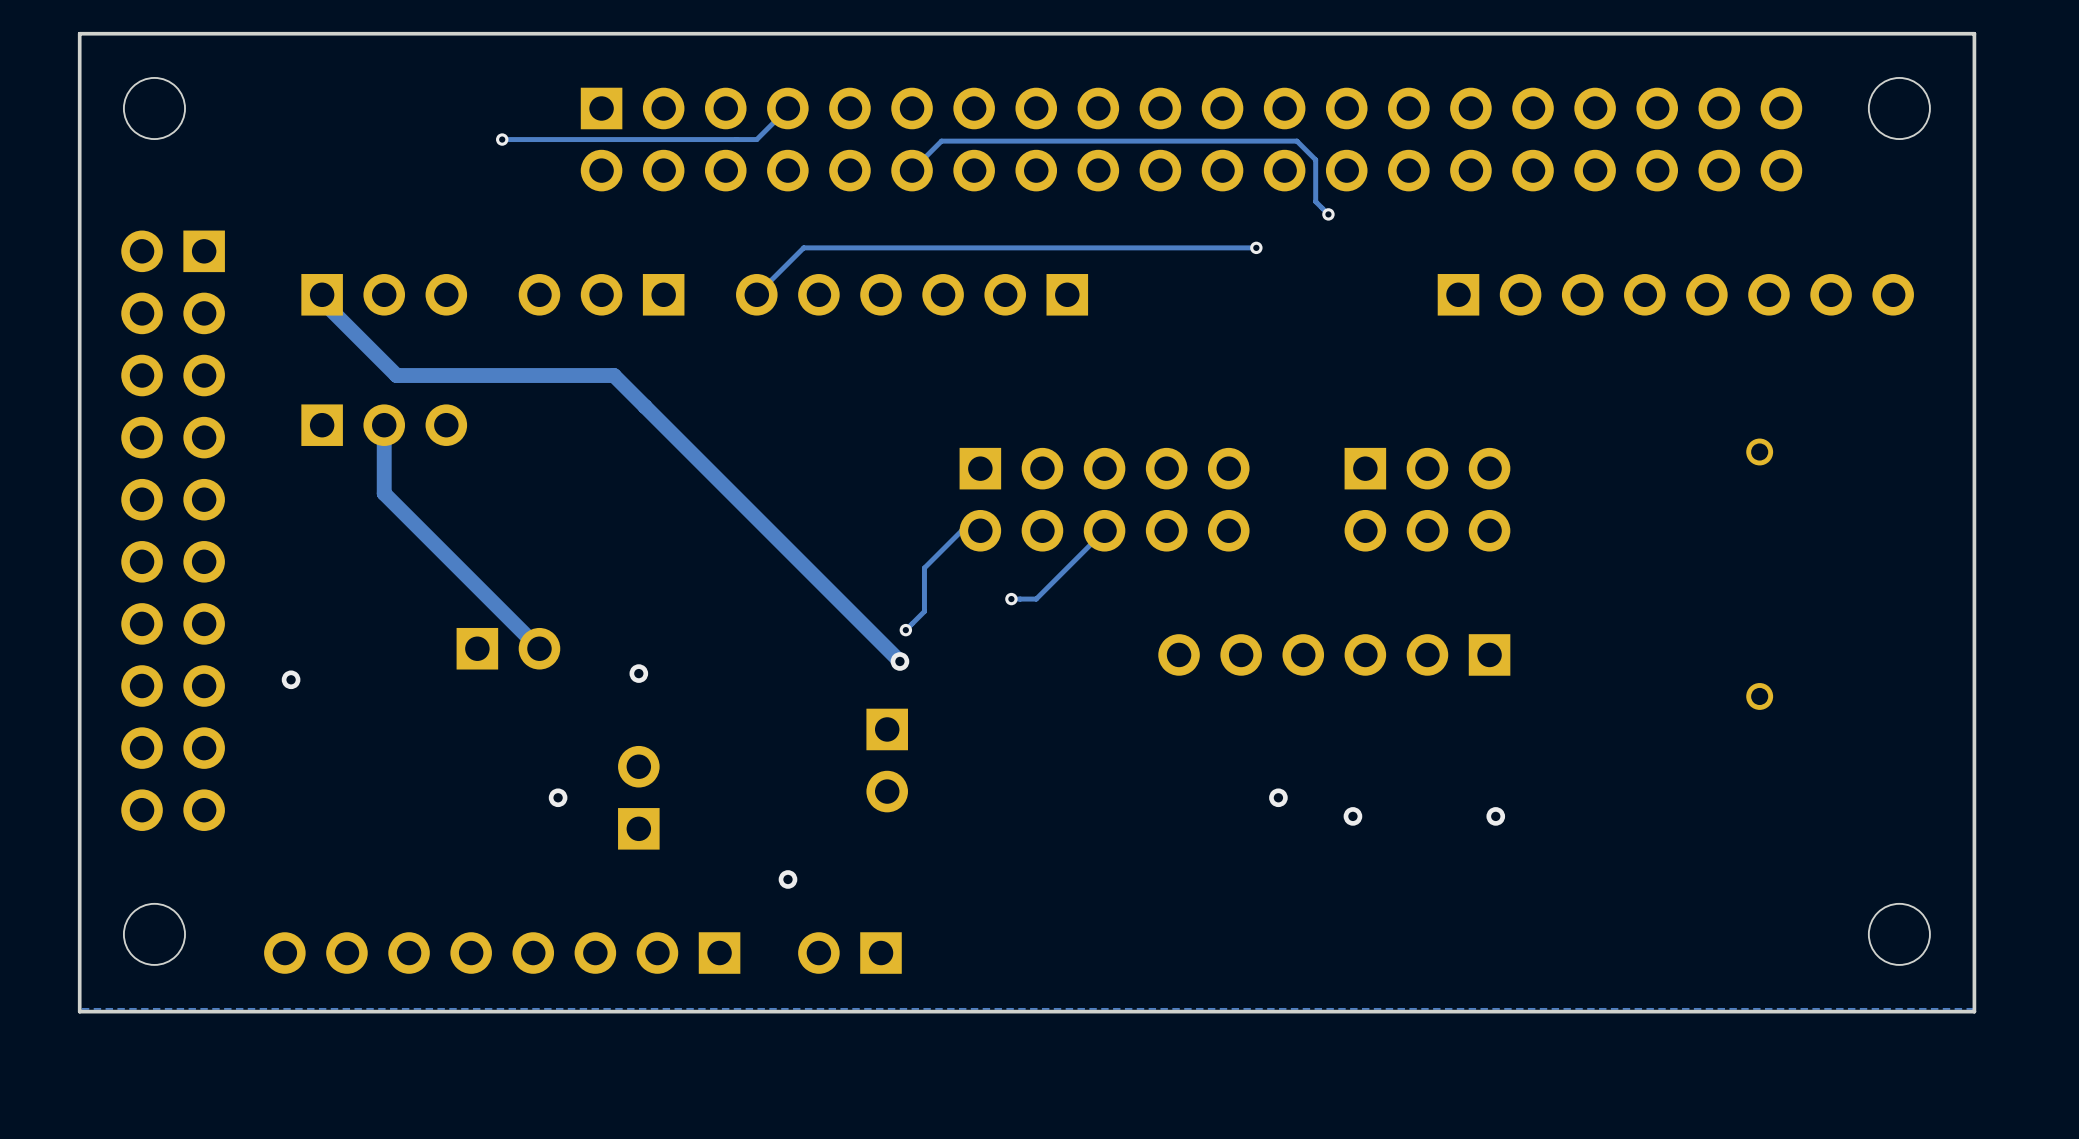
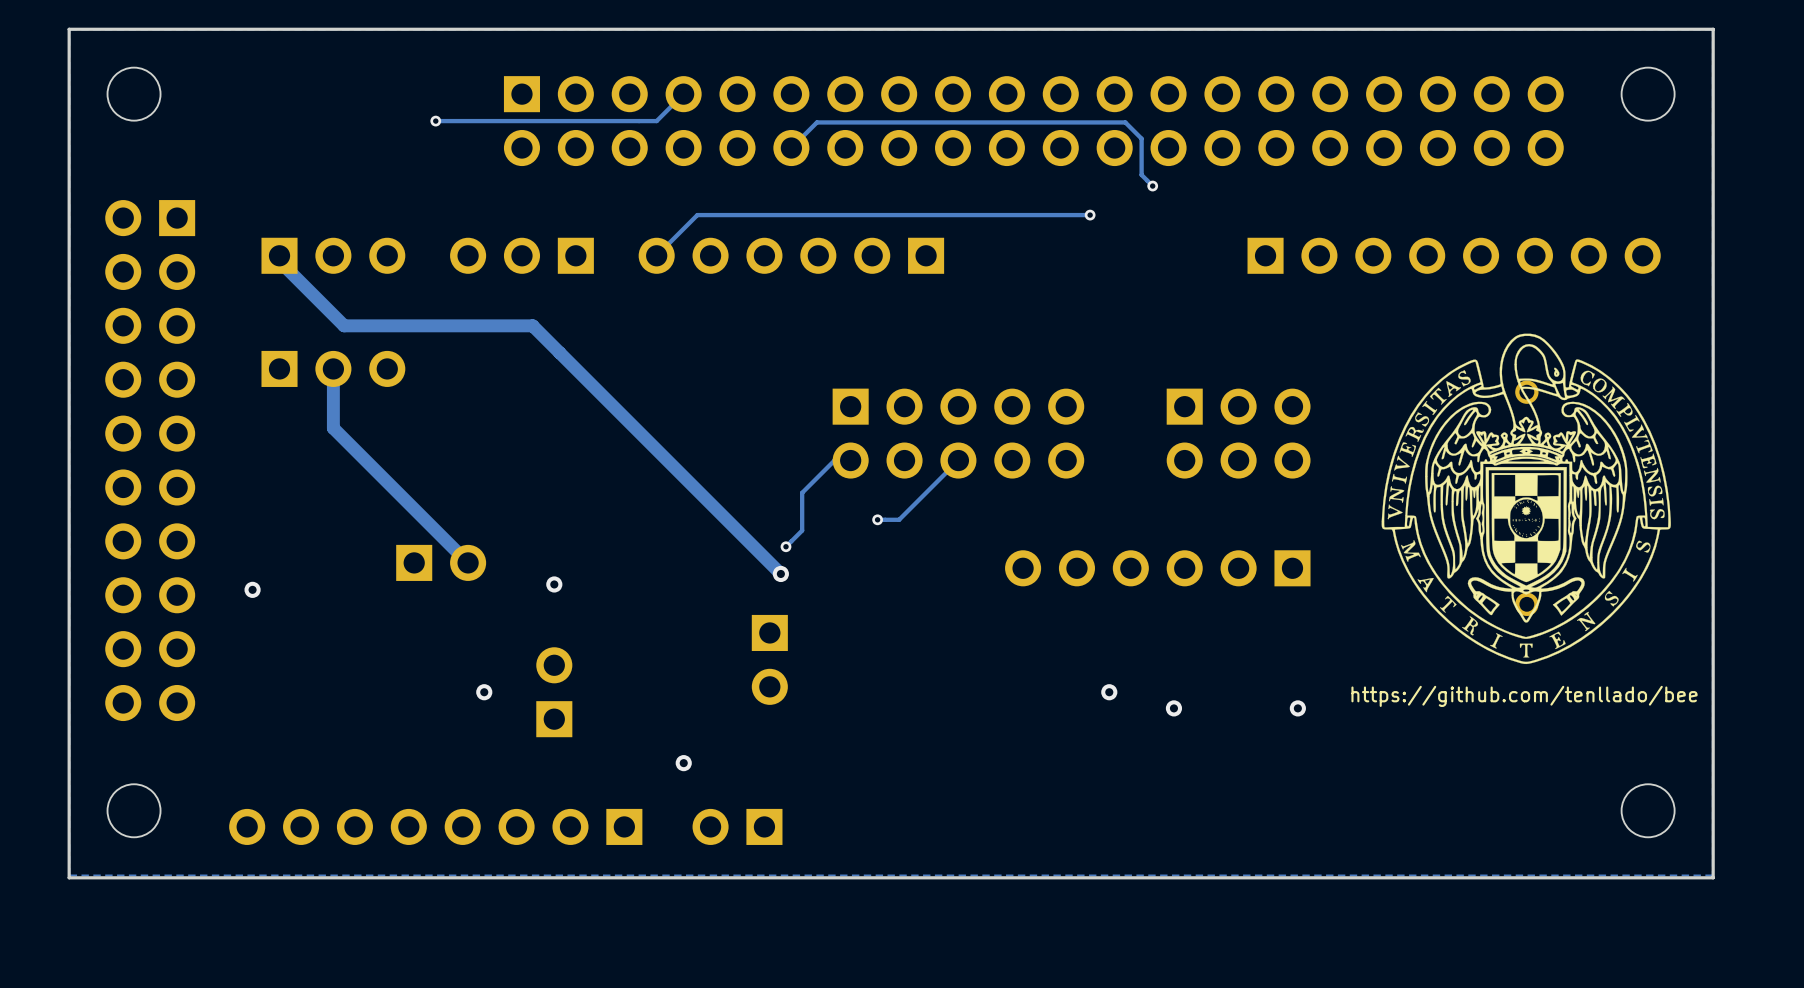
drawing: none -> [1381, 333, 1671, 665]
text: none -> https://github.com/tenllado/bee (1524, 696)

